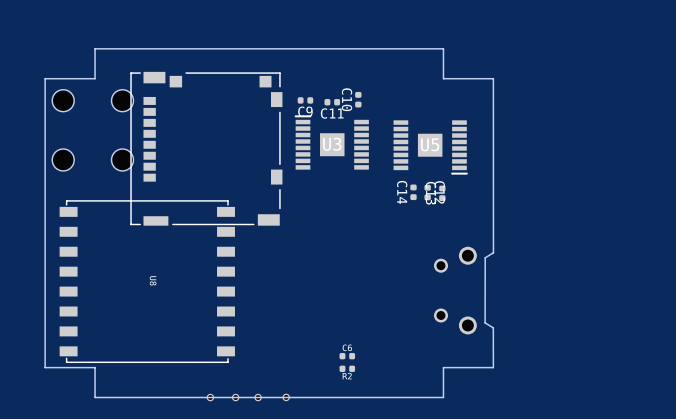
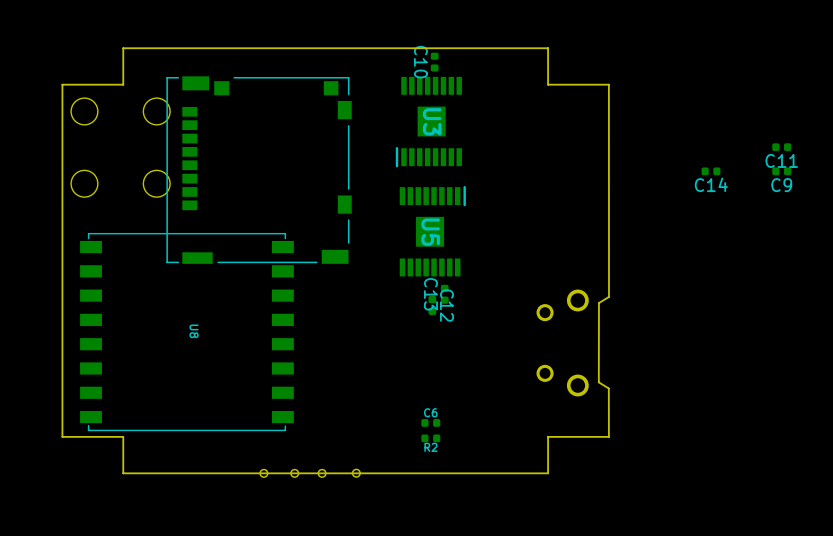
C10 position: (358, 99) -> (434, 62)
C9 position: (305, 100) -> (781, 171)
C11 position: (332, 102) -> (781, 147)
U3 rotation: 0° (331, 142) -> 90° counterclockwise (428, 122)
U5 rotation: 0° (430, 147) -> 90° counterclockwise (432, 231)
U5 position: (430, 147) -> (432, 231)
C14 rotation: 0° (413, 192) -> 90° clockwise (711, 171)
C14 position: (413, 192) -> (711, 171)
C12 position: (427, 192) -> (432, 305)
C13 position: (442, 193) -> (444, 294)

